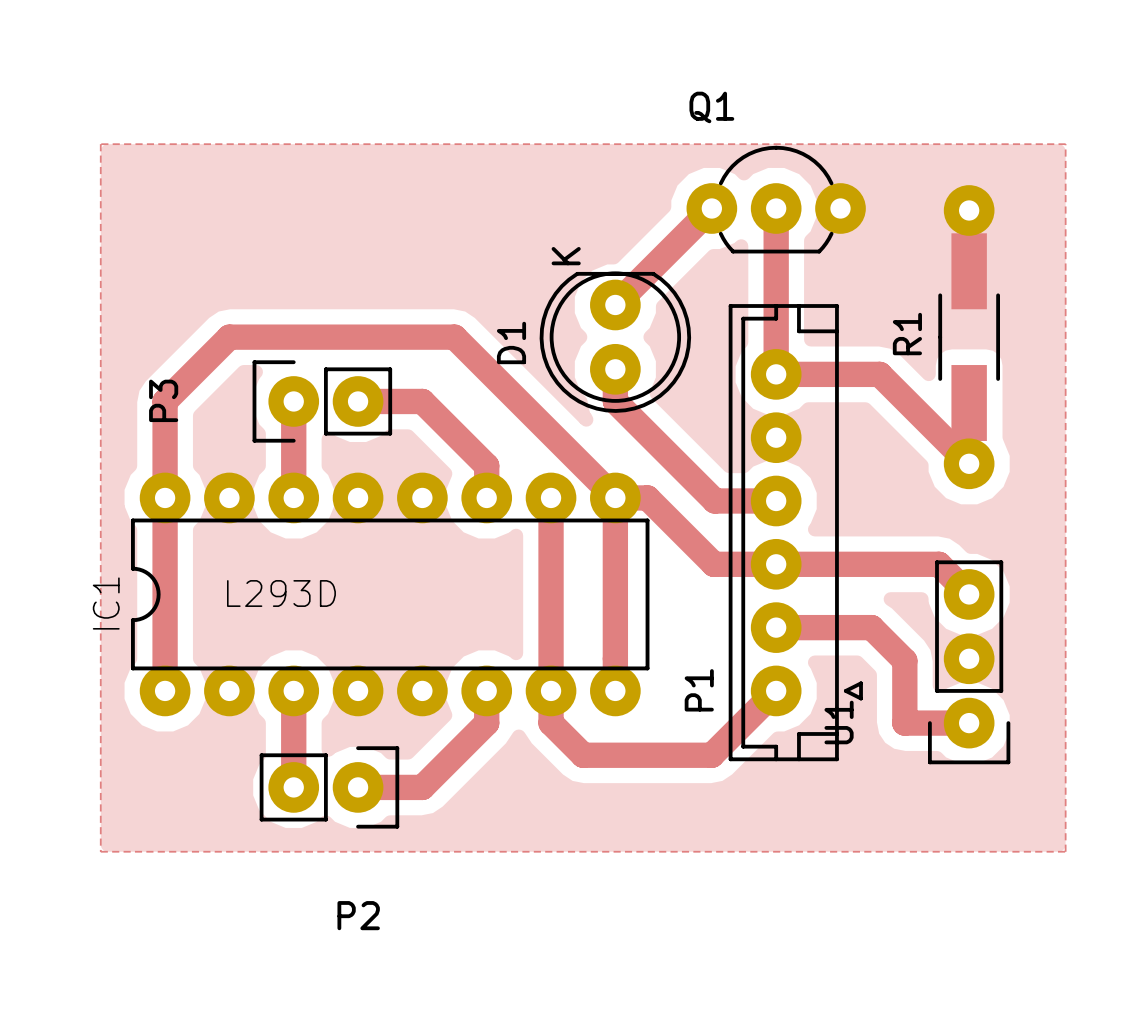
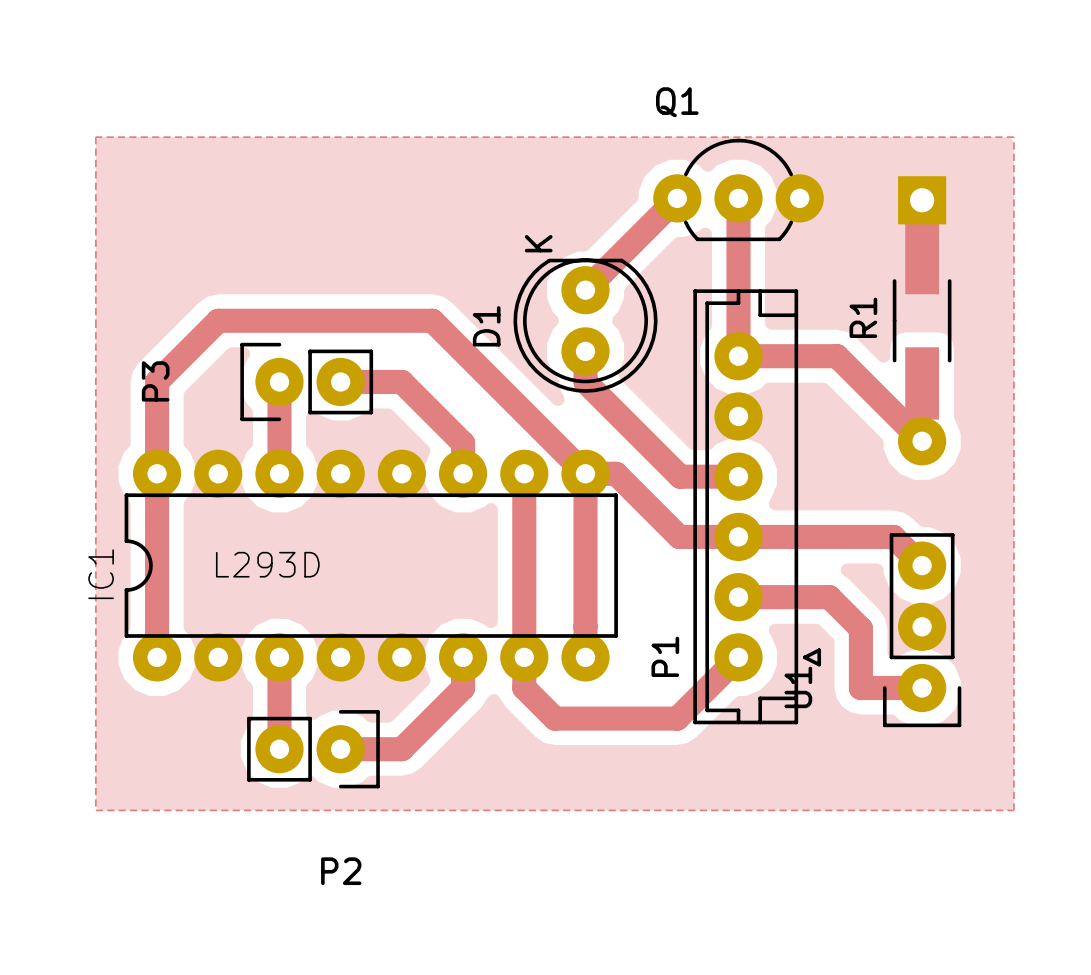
R1 footprint: [938, 185, 1001, 490] -> [892, 176, 952, 466]

